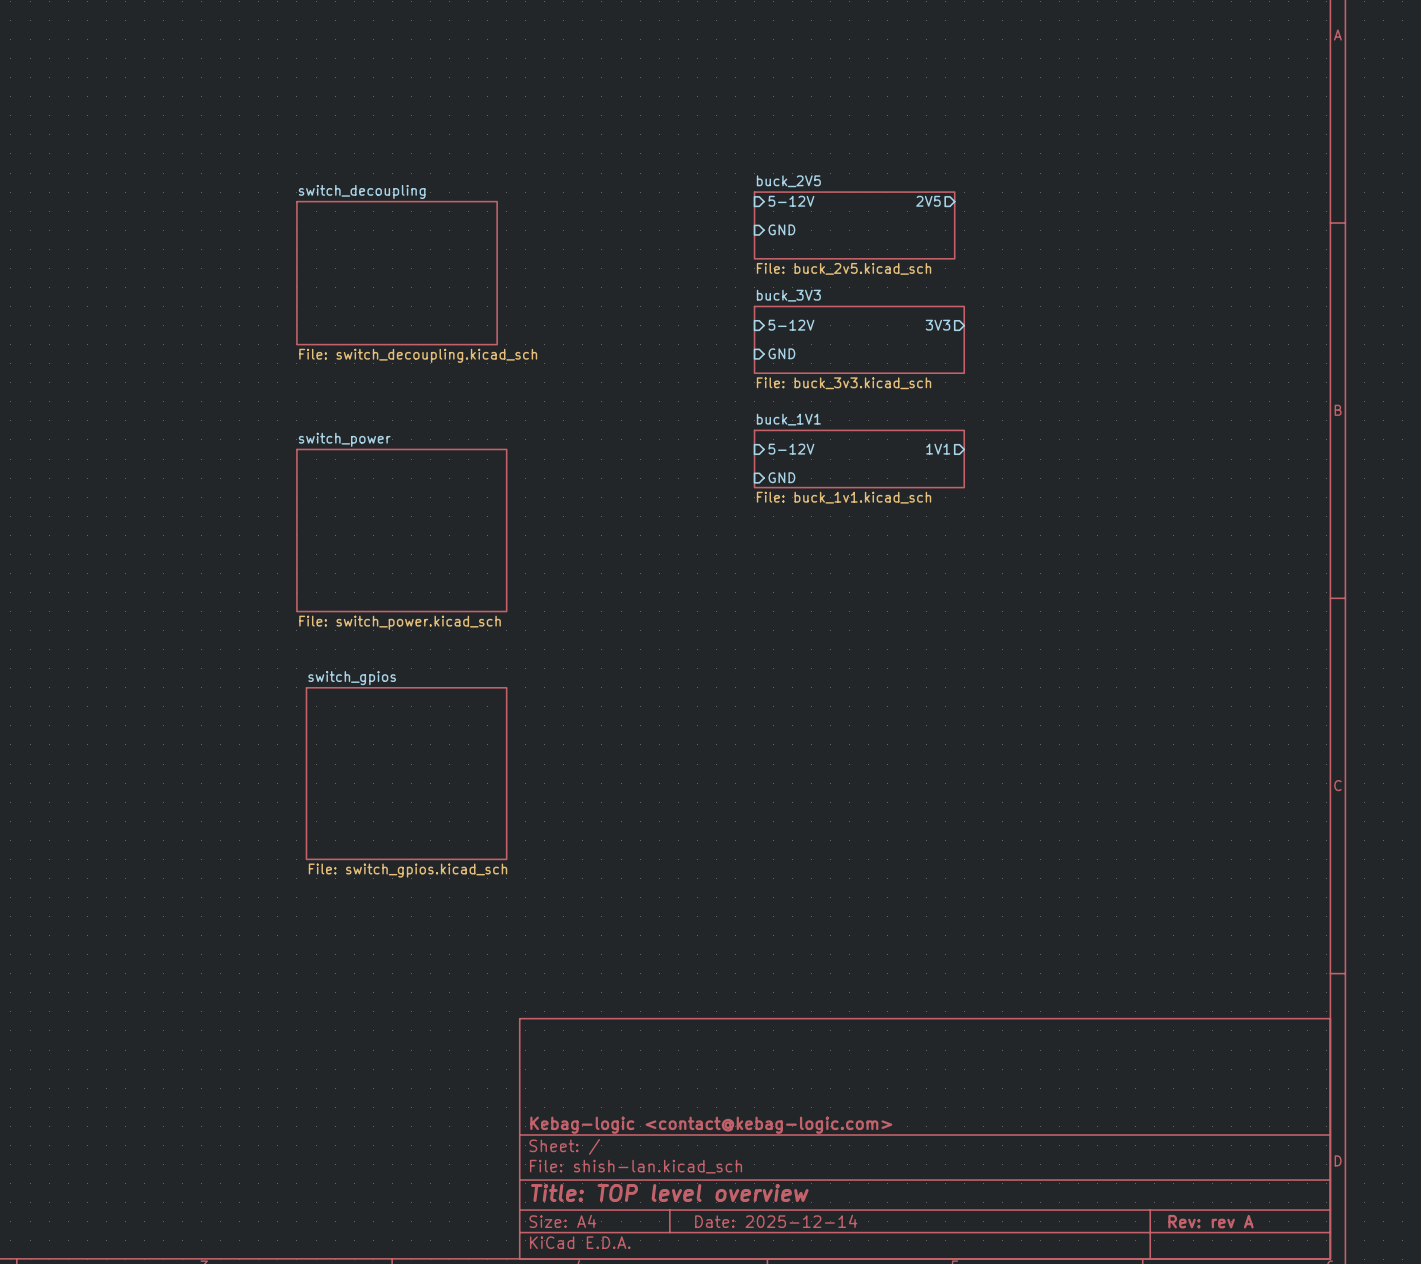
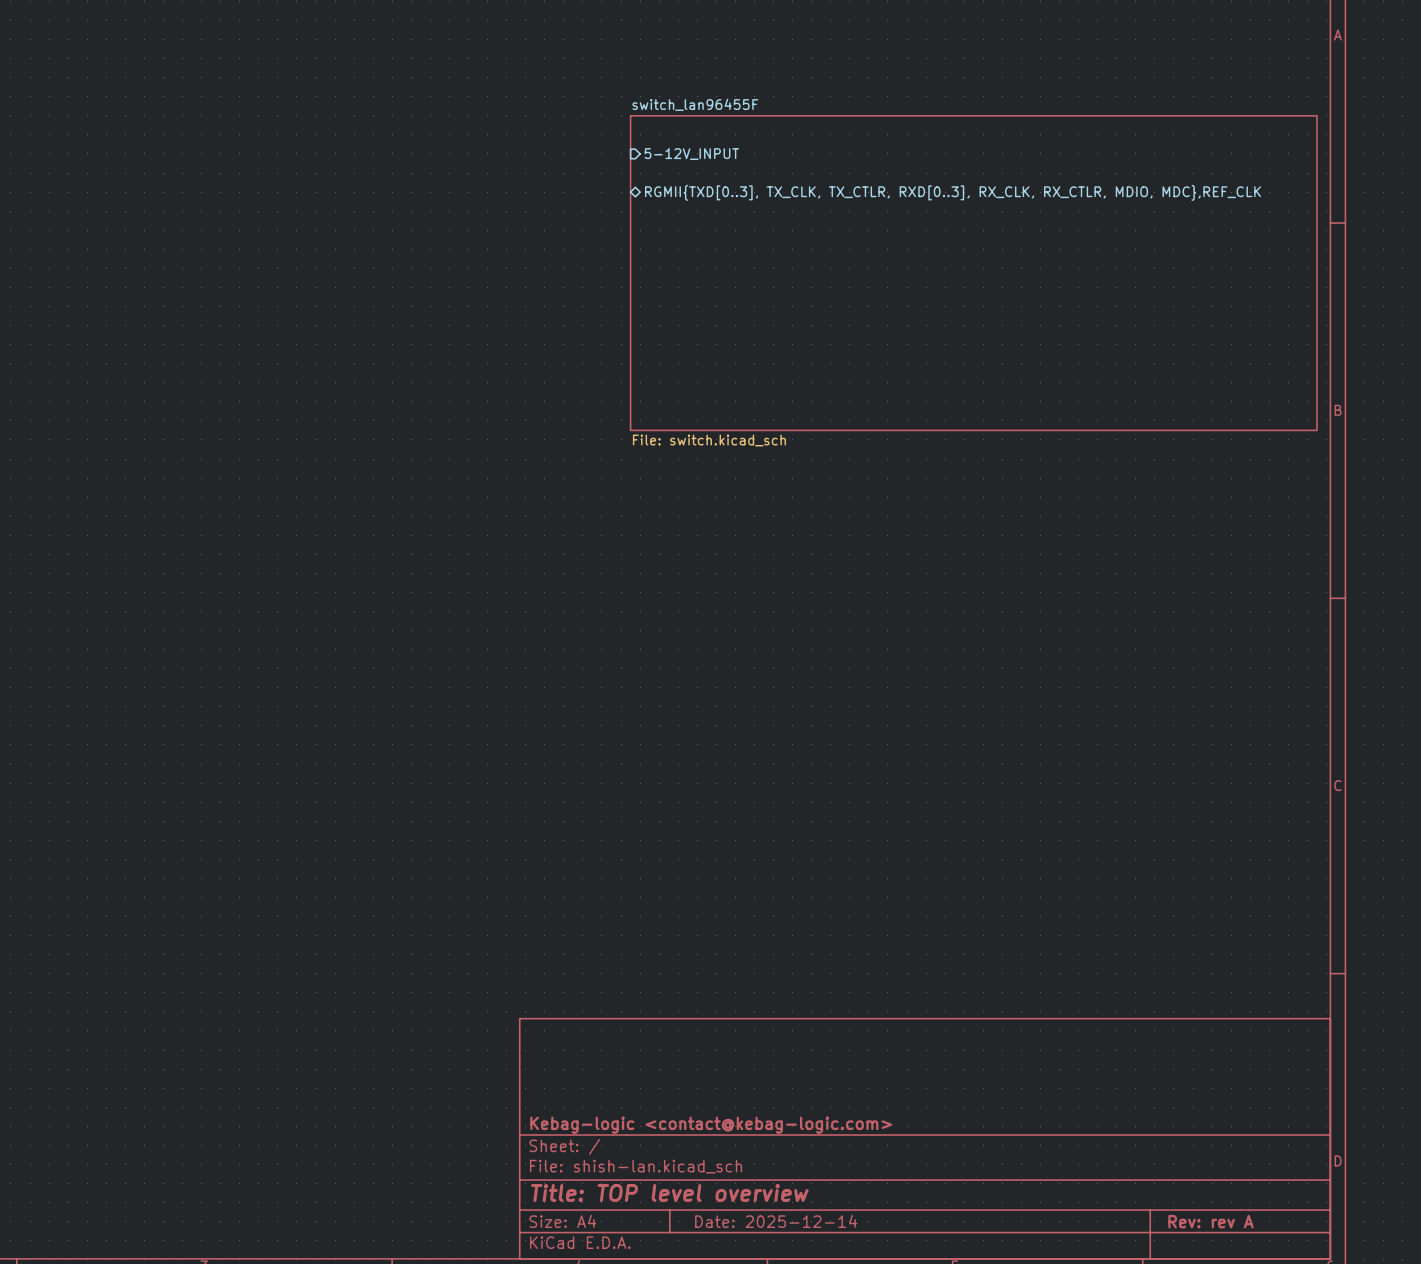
sheet pin: none -> 5-12V_INPUT (691, 154)
sheet pin: none -> RGMII{TXD[0..3], TX_CLK, TX_CTLR, RXD[0..3], RX_CLK, RX_CTLR, MDIO, MDC},REF_CLK (953, 192)
sheet pin: 5-12V (791, 201) -> none
sheet pin: 2V5 (928, 201) -> none
sheet buck_2V5: File: buck_2v5.kicad_sch (854, 225) -> none
sheet pin: GND (781, 229) -> none
sheet switch_decoupling: File: switch_decoupling.kicad_sch (397, 273) -> none
sheet switch_lan96455F: none -> File: switch.kicad_sch (973, 273)
sheet pin: 5-12V (791, 325) -> none
sheet pin: 3V3 (937, 325) -> none
sheet buck_3V3: File: buck_3v3.kicad_sch (859, 339) -> none
sheet pin: GND (781, 353) -> none
sheet pin: 5-12V (791, 449) -> none
sheet pin: 1V1 (938, 449) -> none
sheet buck_1V1: File: buck_1v1.kicad_sch (859, 459) -> none
sheet pin: GND (781, 477) -> none
sheet switch_power: File: switch_power.kicad_sch (401, 530) -> none
sheet switch_gpios: File: switch_gpios.kicad_sch (406, 773) -> none

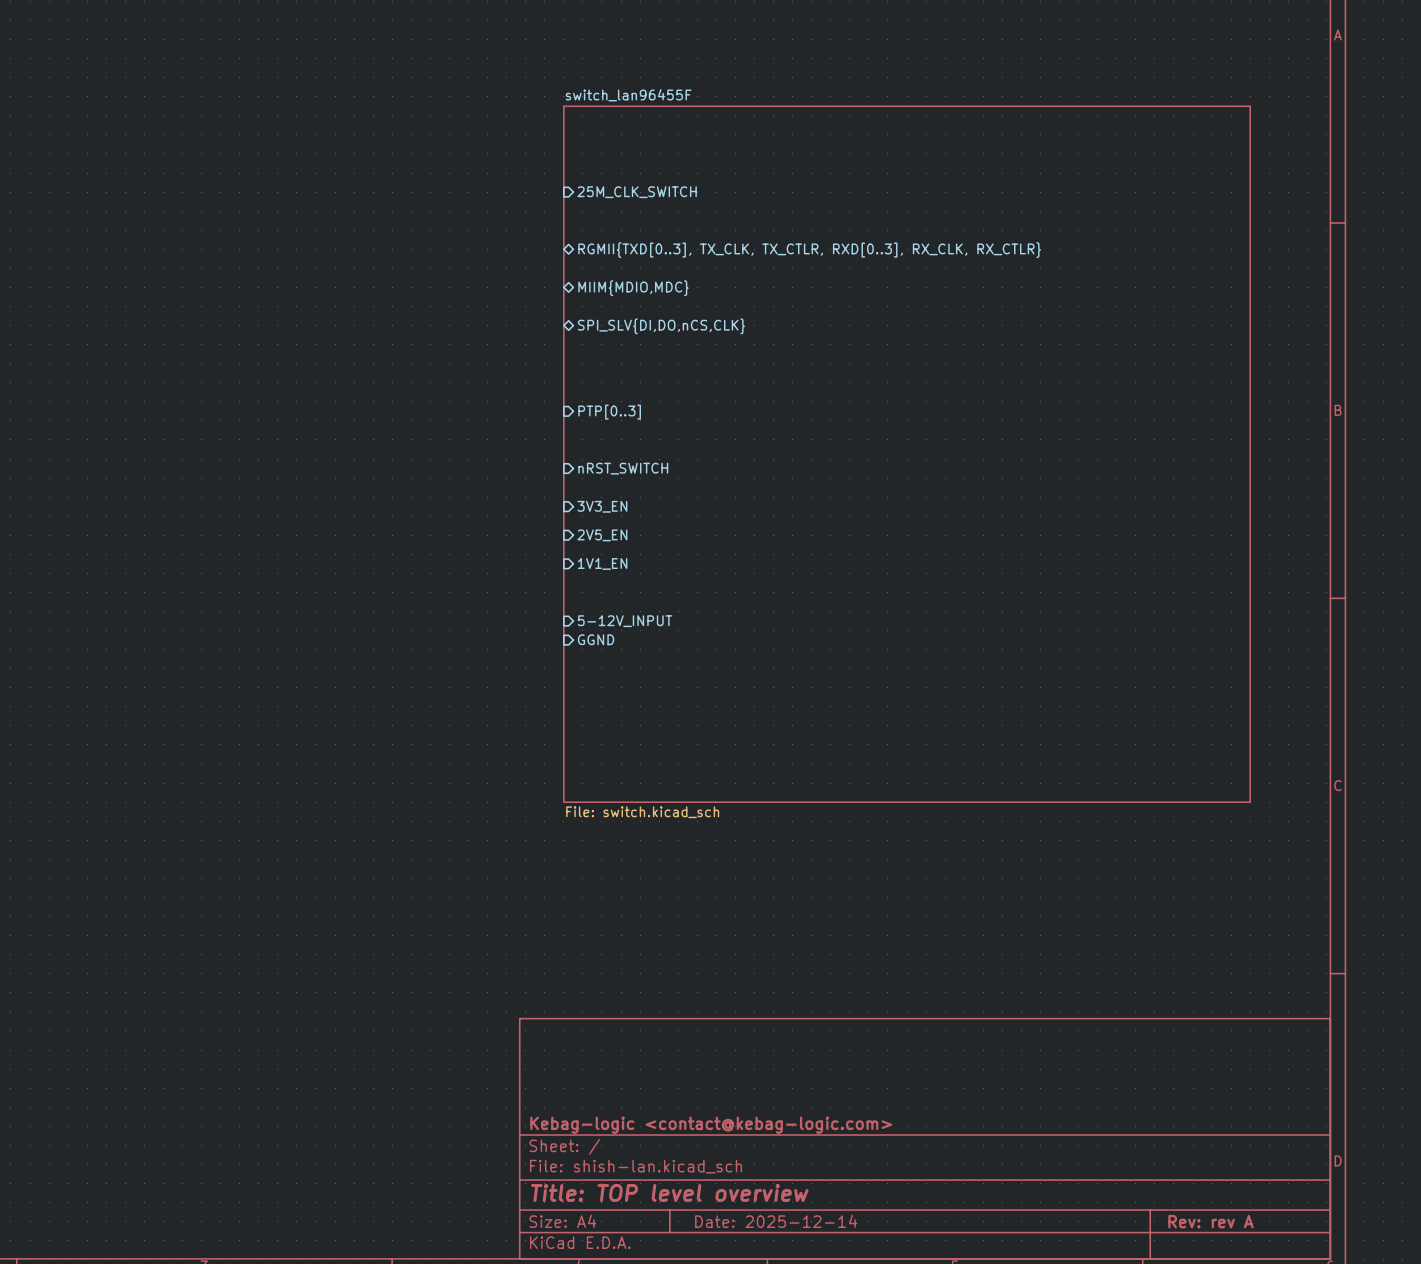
sheet switch_lan96455F name position: switch_lan96455F (695, 104) -> switch_lan96455F (628, 95)
sheet switch_lan96455F shape: [630, 115, 1318, 431] -> [563, 105, 1251, 803]
sheet pin: 5-12V_INPUT (691, 154) -> none
sheet pin: none -> 25M_CLK_SWITCH (637, 192)
sheet pin: RGMII{TXD[0..3], TX_CLK, TX_CTLR, RXD[0..3], RX_CLK, RX_CTLR, MDIO, MDC},REF_CLK (953, 192) -> none
sheet pin: none -> RGMII{TXD[0..3], TX_CLK, TX_CTLR, RXD[0..3], RX_CLK, RX_CTLR} (809, 250)
sheet pin: none -> MIIM{MDIO,MDC} (633, 288)
sheet pin: none -> SPI_SLV{DI,DO,nCS,CLK} (661, 326)
sheet pin: none -> PTP[0..3] (609, 412)
sheet switch_lan96455F value position: File: switch.kicad_sch (709, 440) -> File: switch.kicad_sch (642, 812)
sheet pin: none -> nRST_SWITCH (623, 468)
sheet pin: none -> 3V3_EN (602, 506)
sheet pin: none -> 2V5_EN (602, 535)
sheet pin: none -> 1V1_EN (602, 563)
sheet pin: none -> 5-12V_INPUT (625, 621)
sheet pin: none -> GGND (596, 639)

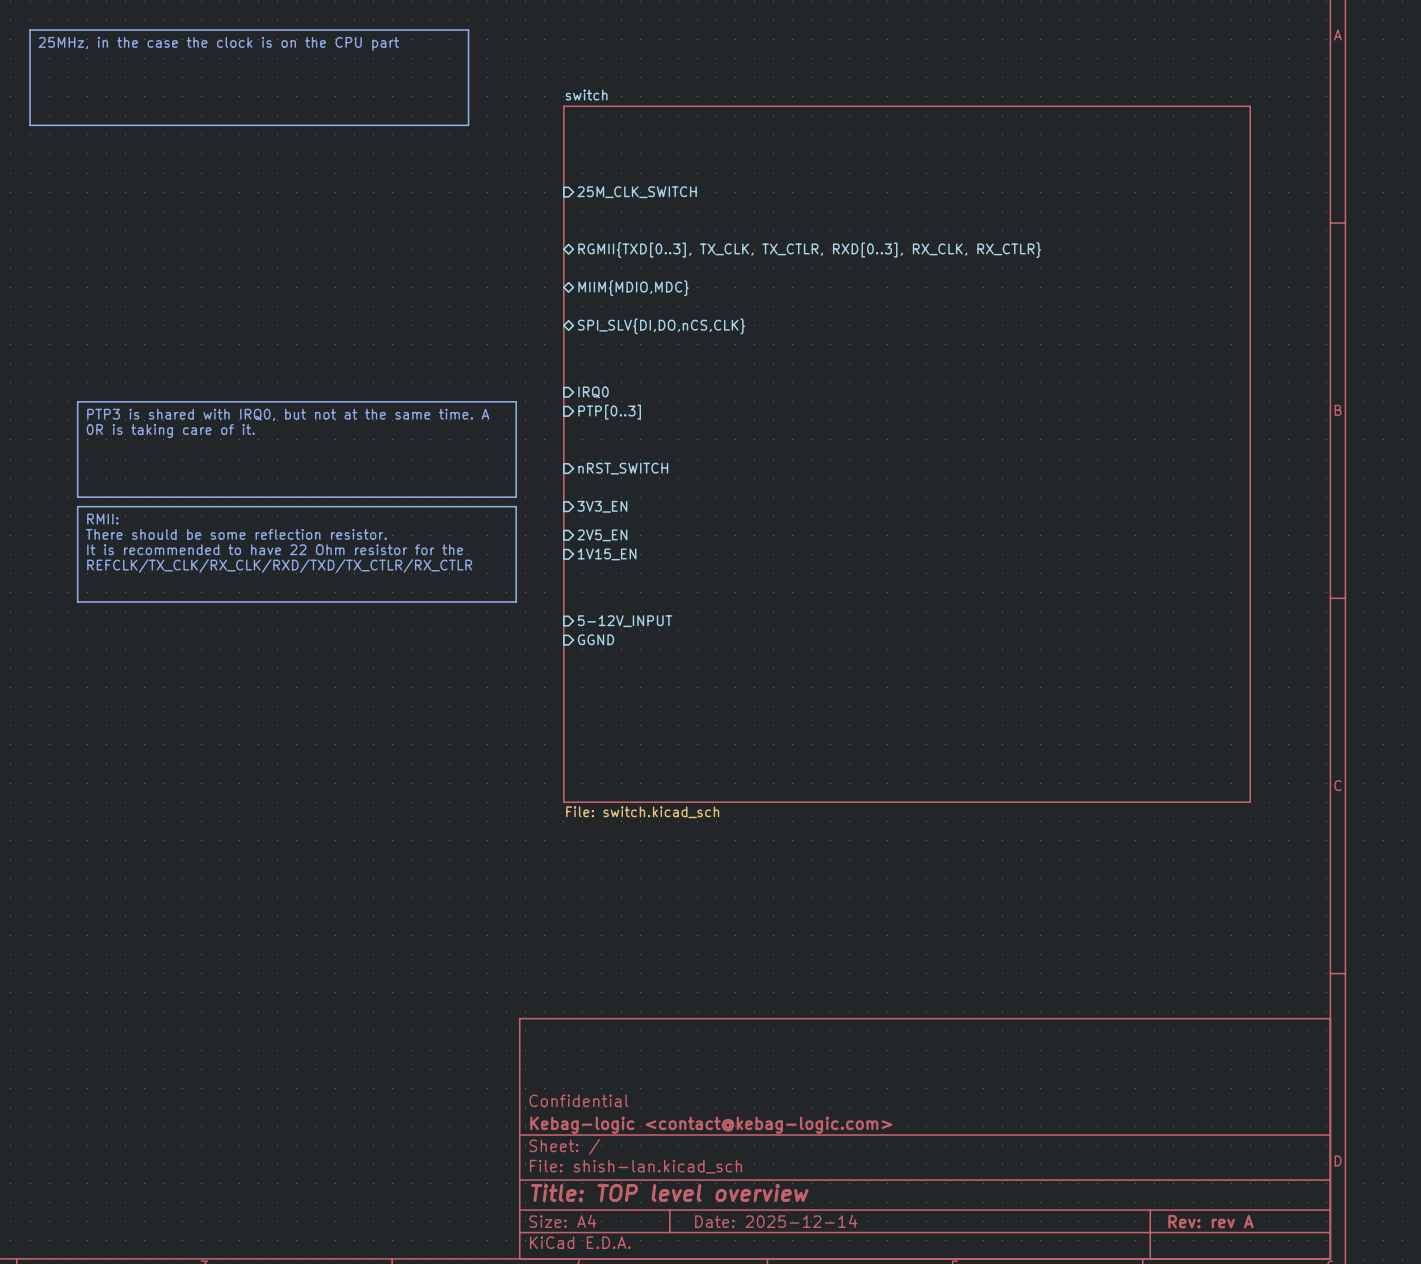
line: none -> (30, 30) (468, 30) (468, 125) (30, 125) (30, 30)
text: none -> 25MHz, in the case the clock is on the CPU part (218, 43)
sheet switch_lan96455F name: switch_lan96455F (628, 95) -> switch (586, 95)
sheet pin: none -> IRQ0 (593, 392)
line: none -> (77, 401) (77, 497) (516, 497) (516, 401) (77, 401)
text: none -> PTP3 is shared with IRQ0, but not at the same time. A (288, 414)
text: none -> 0R is taking care of it. (170, 431)
line: none -> (77, 506) (516, 506) (516, 601) (77, 601) (77, 506)
text: none -> RMII: (102, 519)
text: none -> There should be some reflection resistor. (236, 534)
text: none -> It is recommended to have 22 Ohm resistor for the (275, 549)
sheet pin: 1V1_EN (602, 563) -> 1V15_EN (607, 554)
text: none -> REFCLK/TX_CLK/RX_CLK/RXD/TXD/TX_CTLR/RX_CTLR (279, 565)
title block: none -> Confidential (578, 1100)

